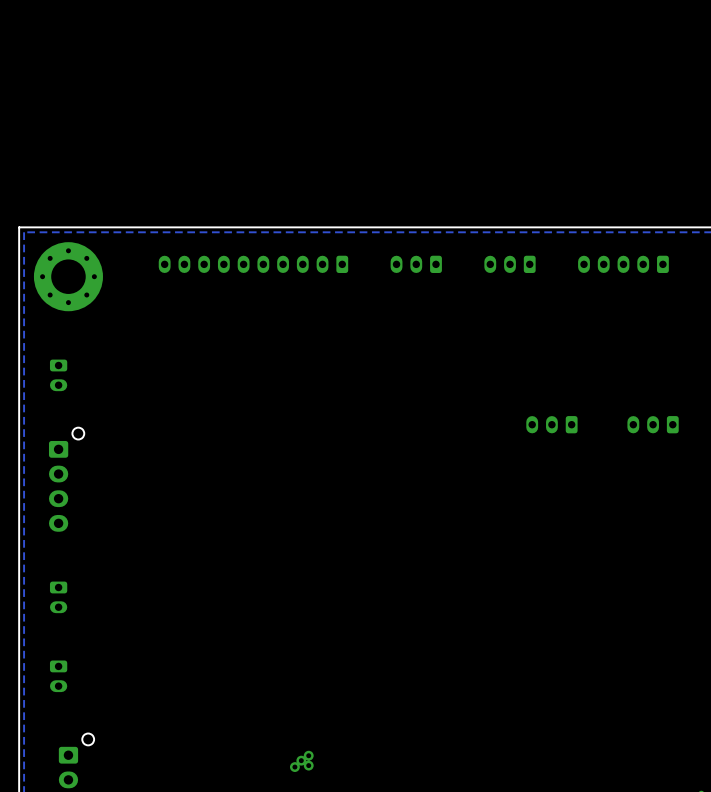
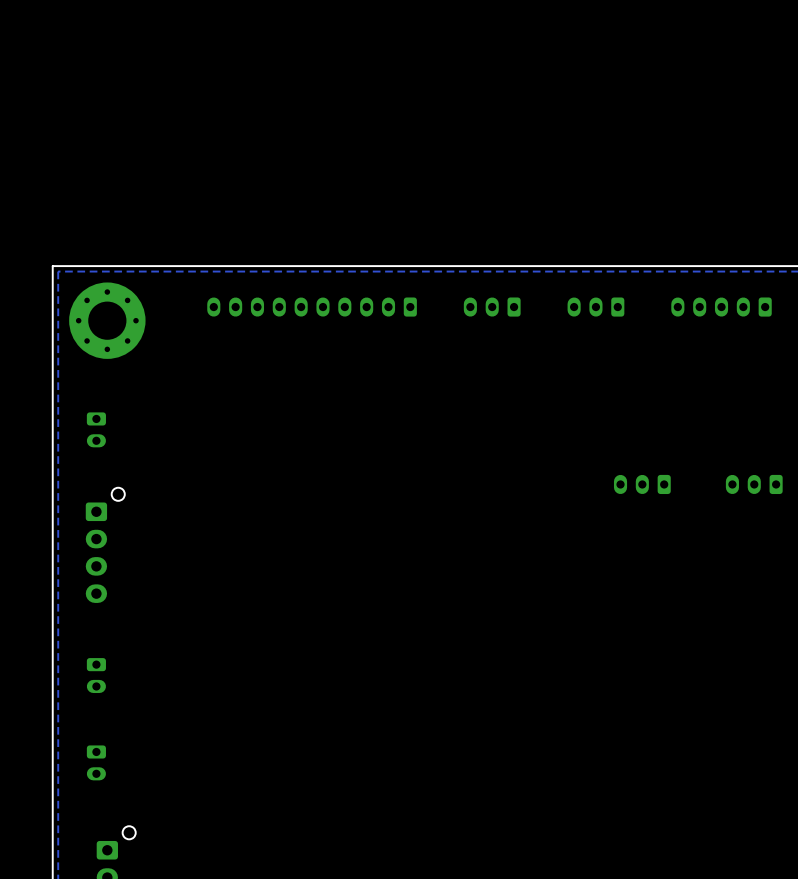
via: (308, 755) -> none
via: (301, 760) -> none
via: (308, 765) -> none
via: (294, 767) -> none

